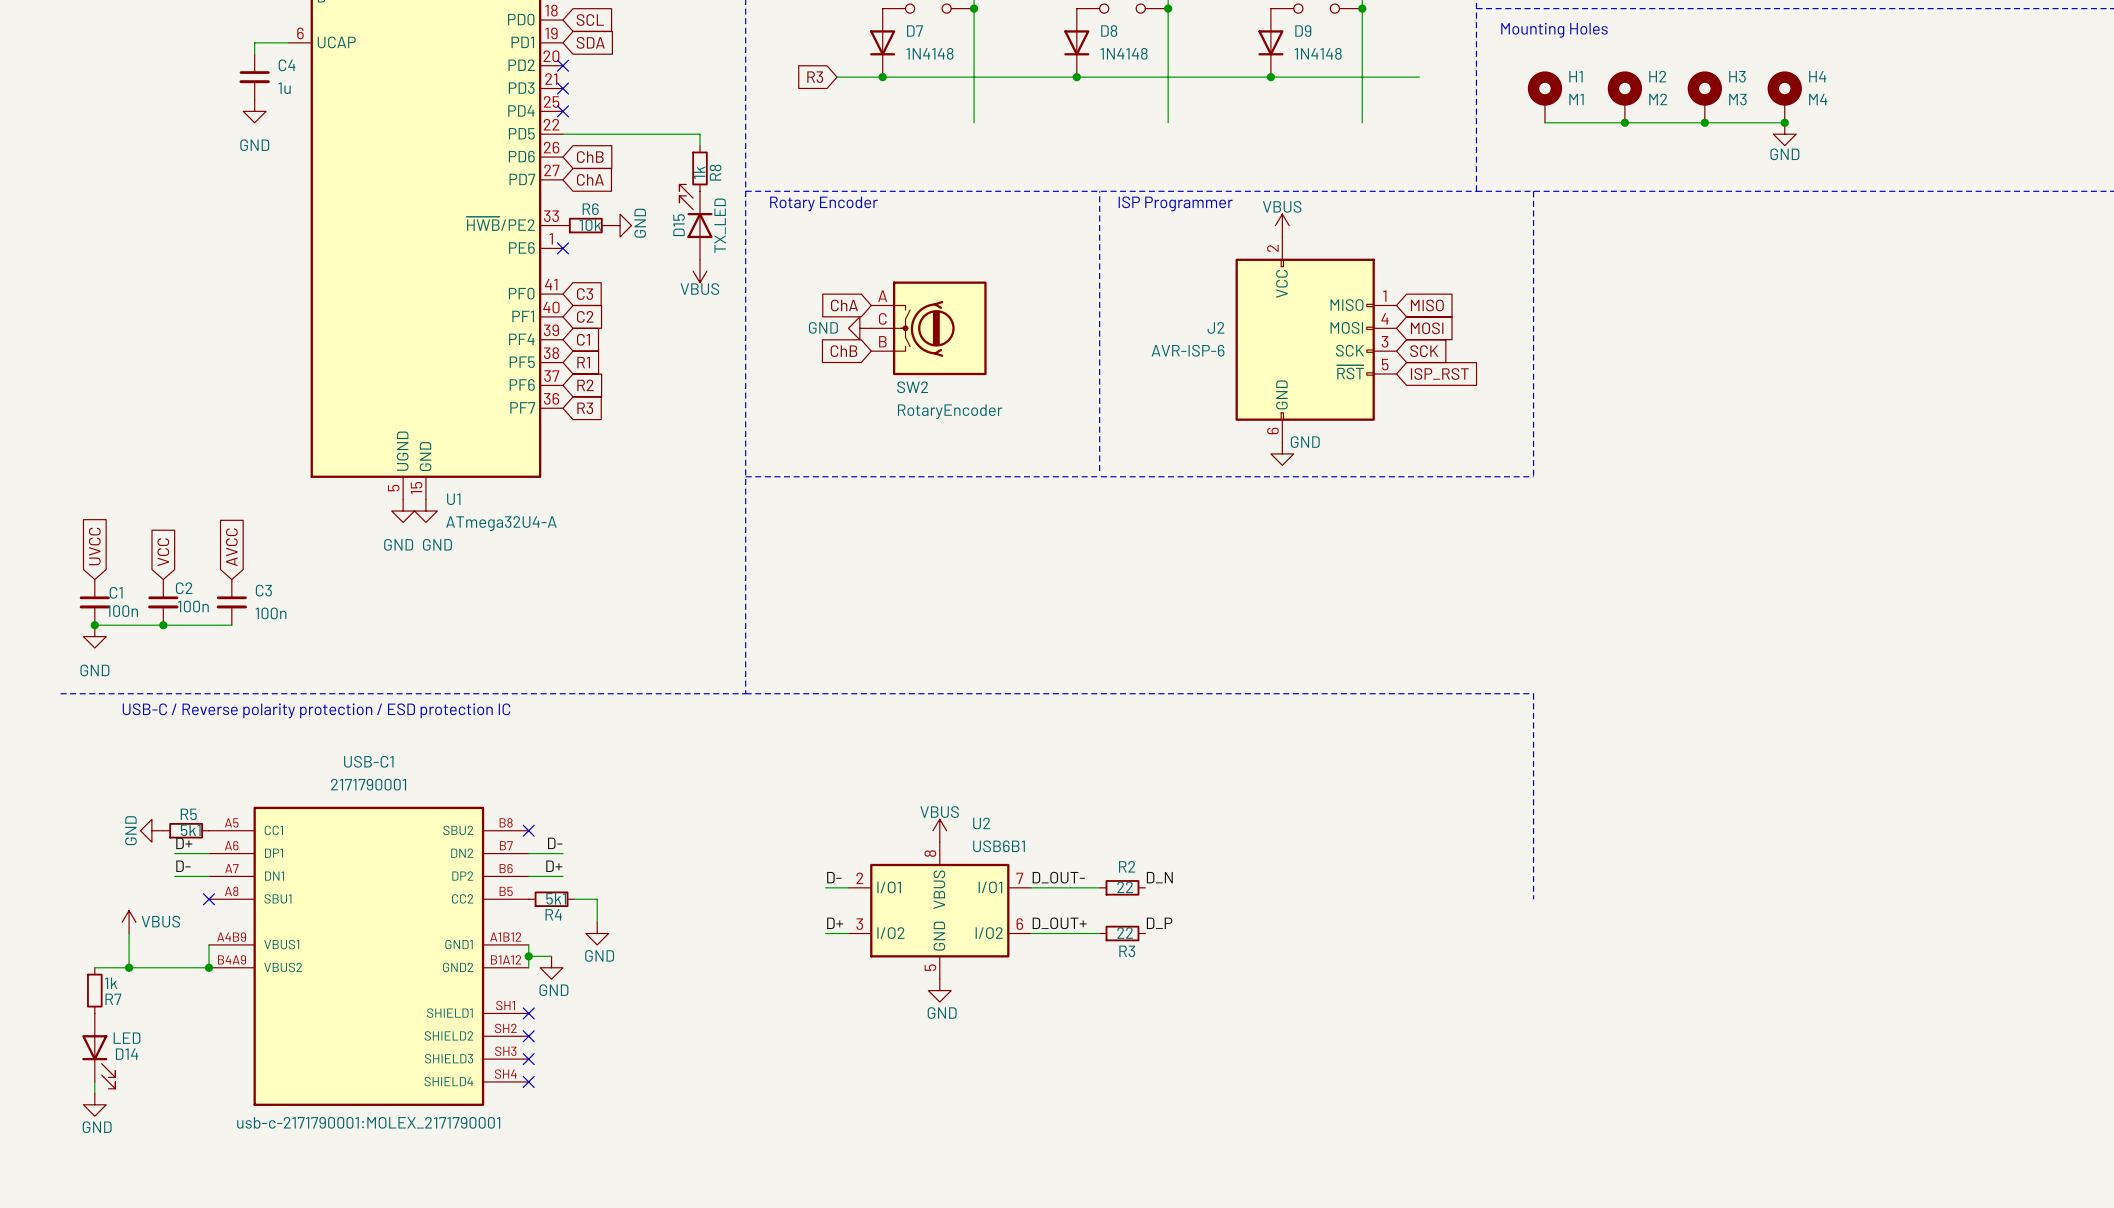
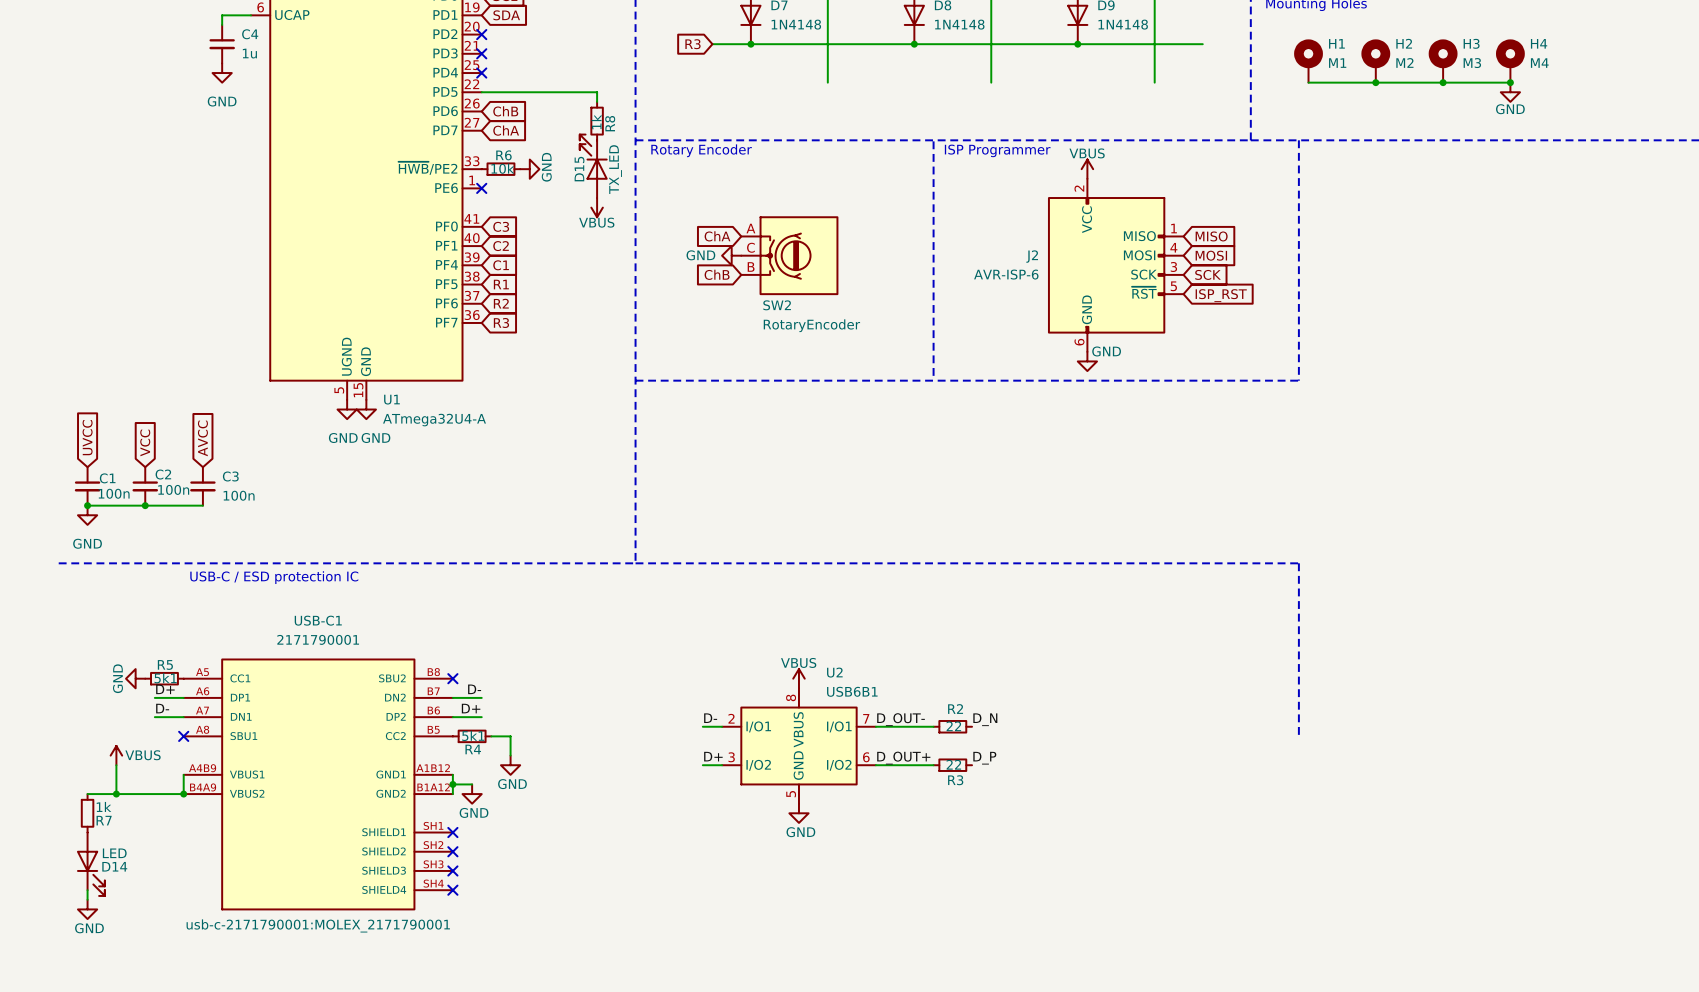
text: USB-C / Reverse polarity protection / ESD protection IC (316, 710) -> USB-C / ESD protection IC (274, 577)

